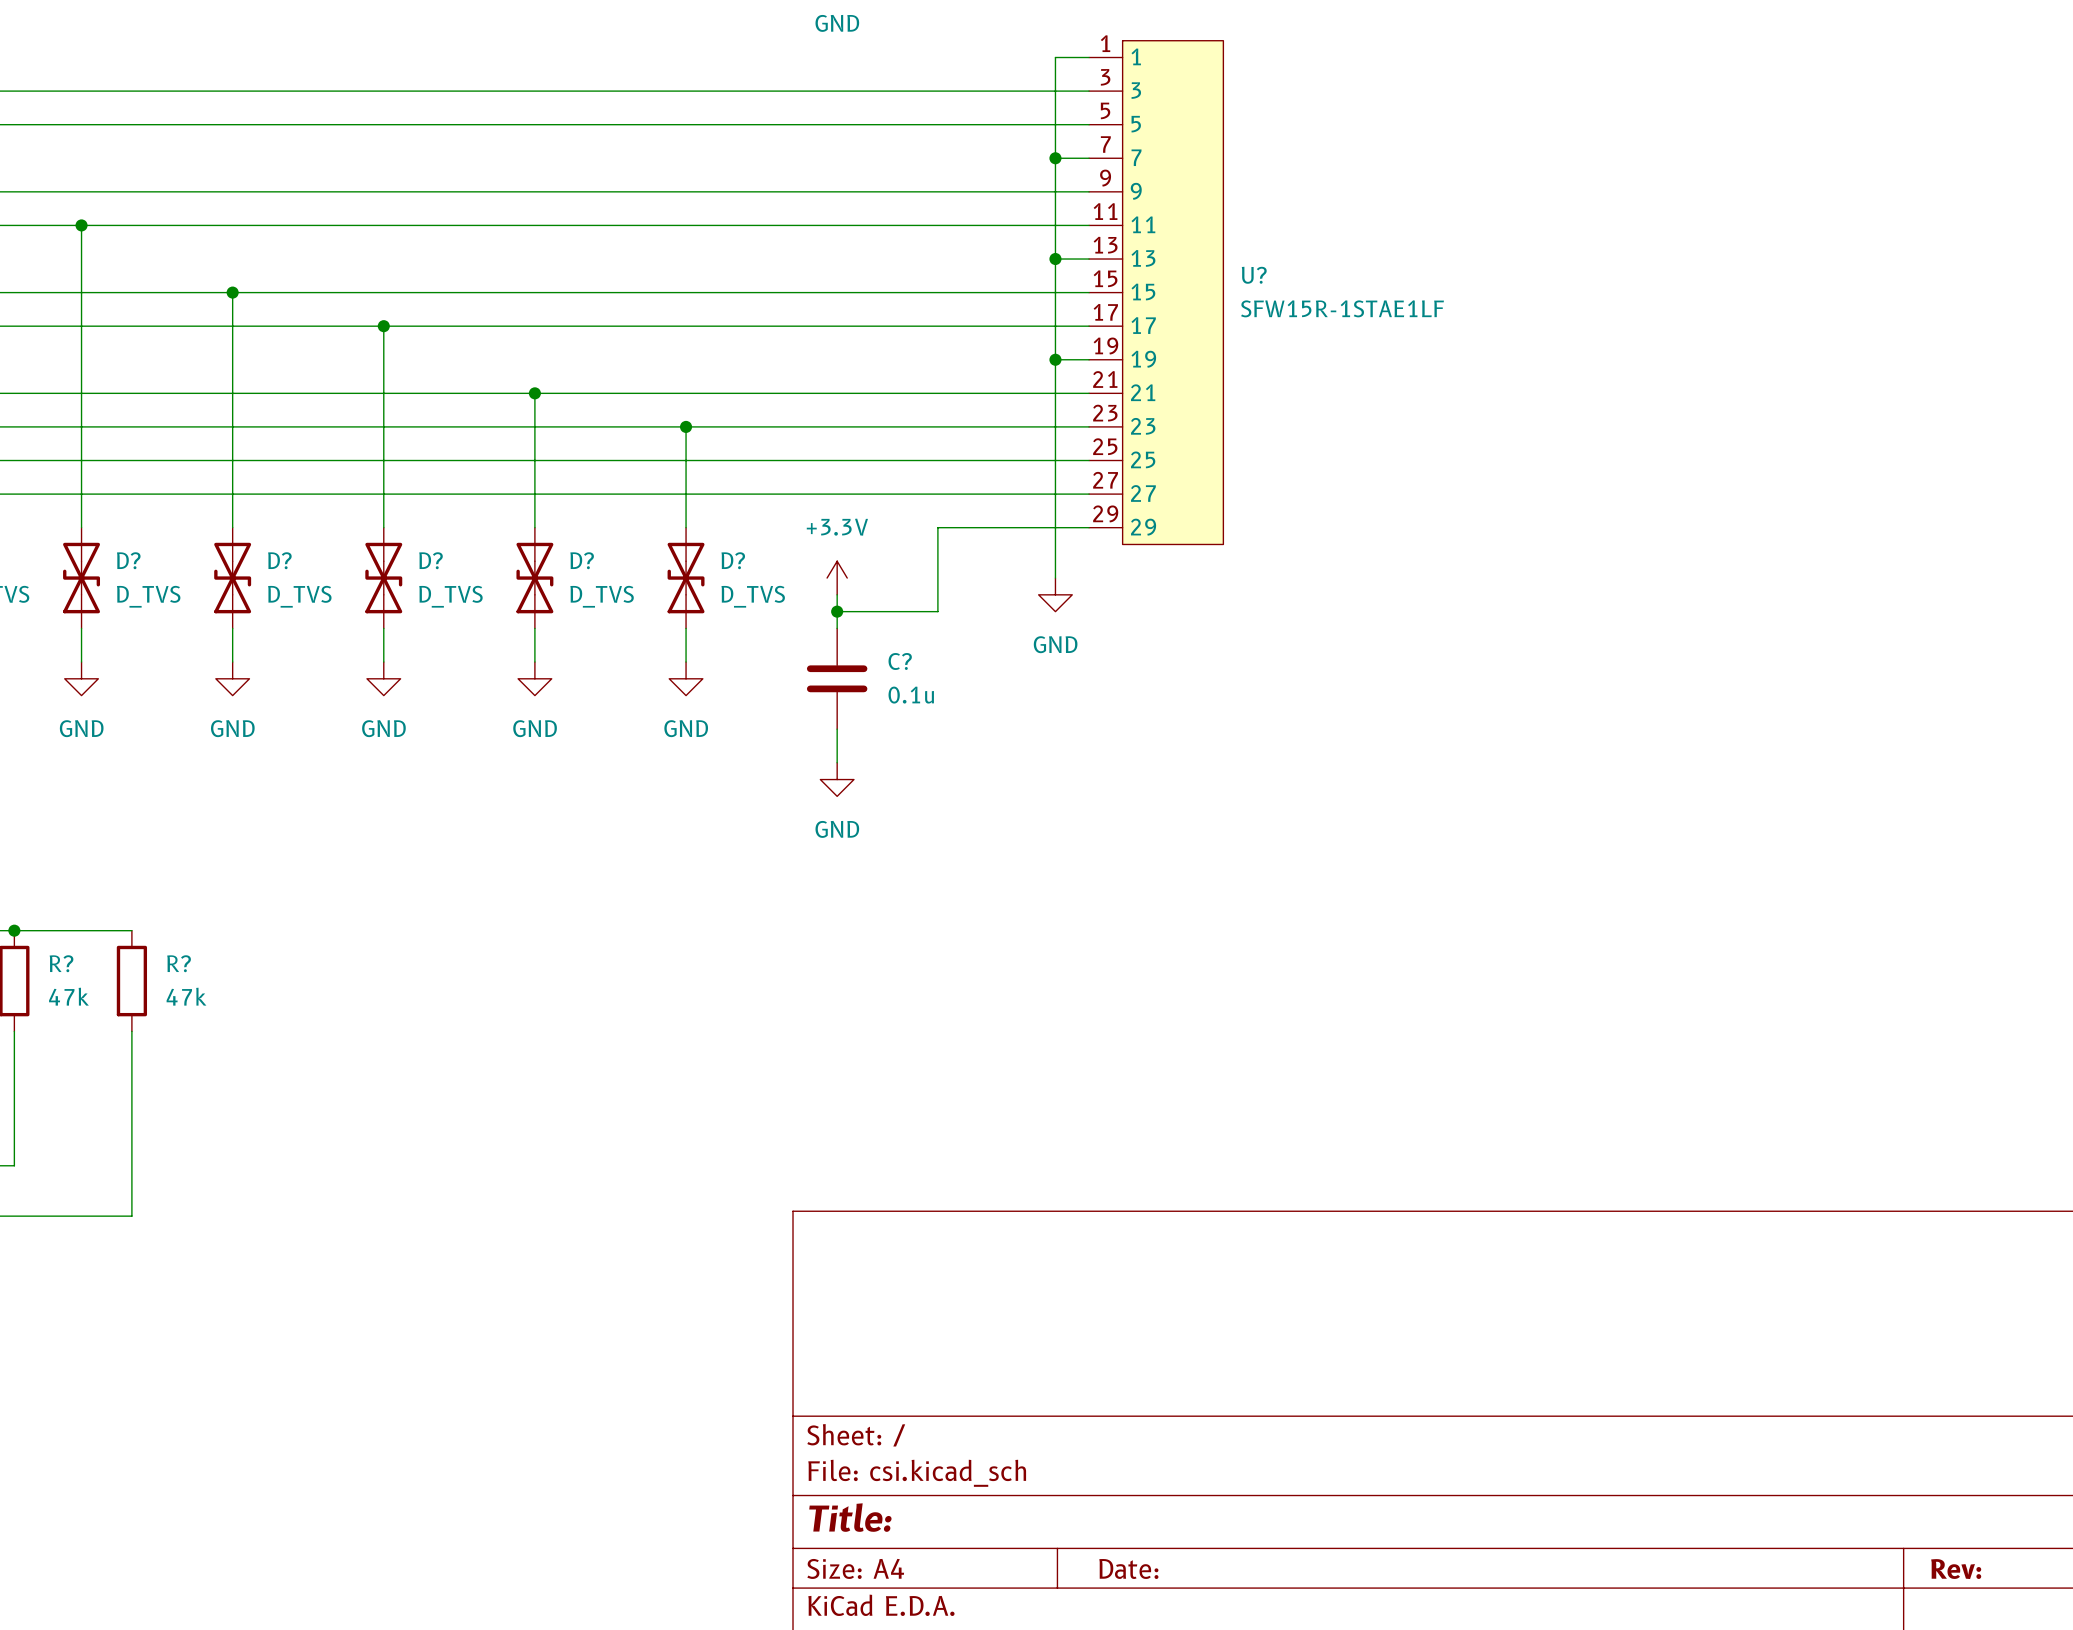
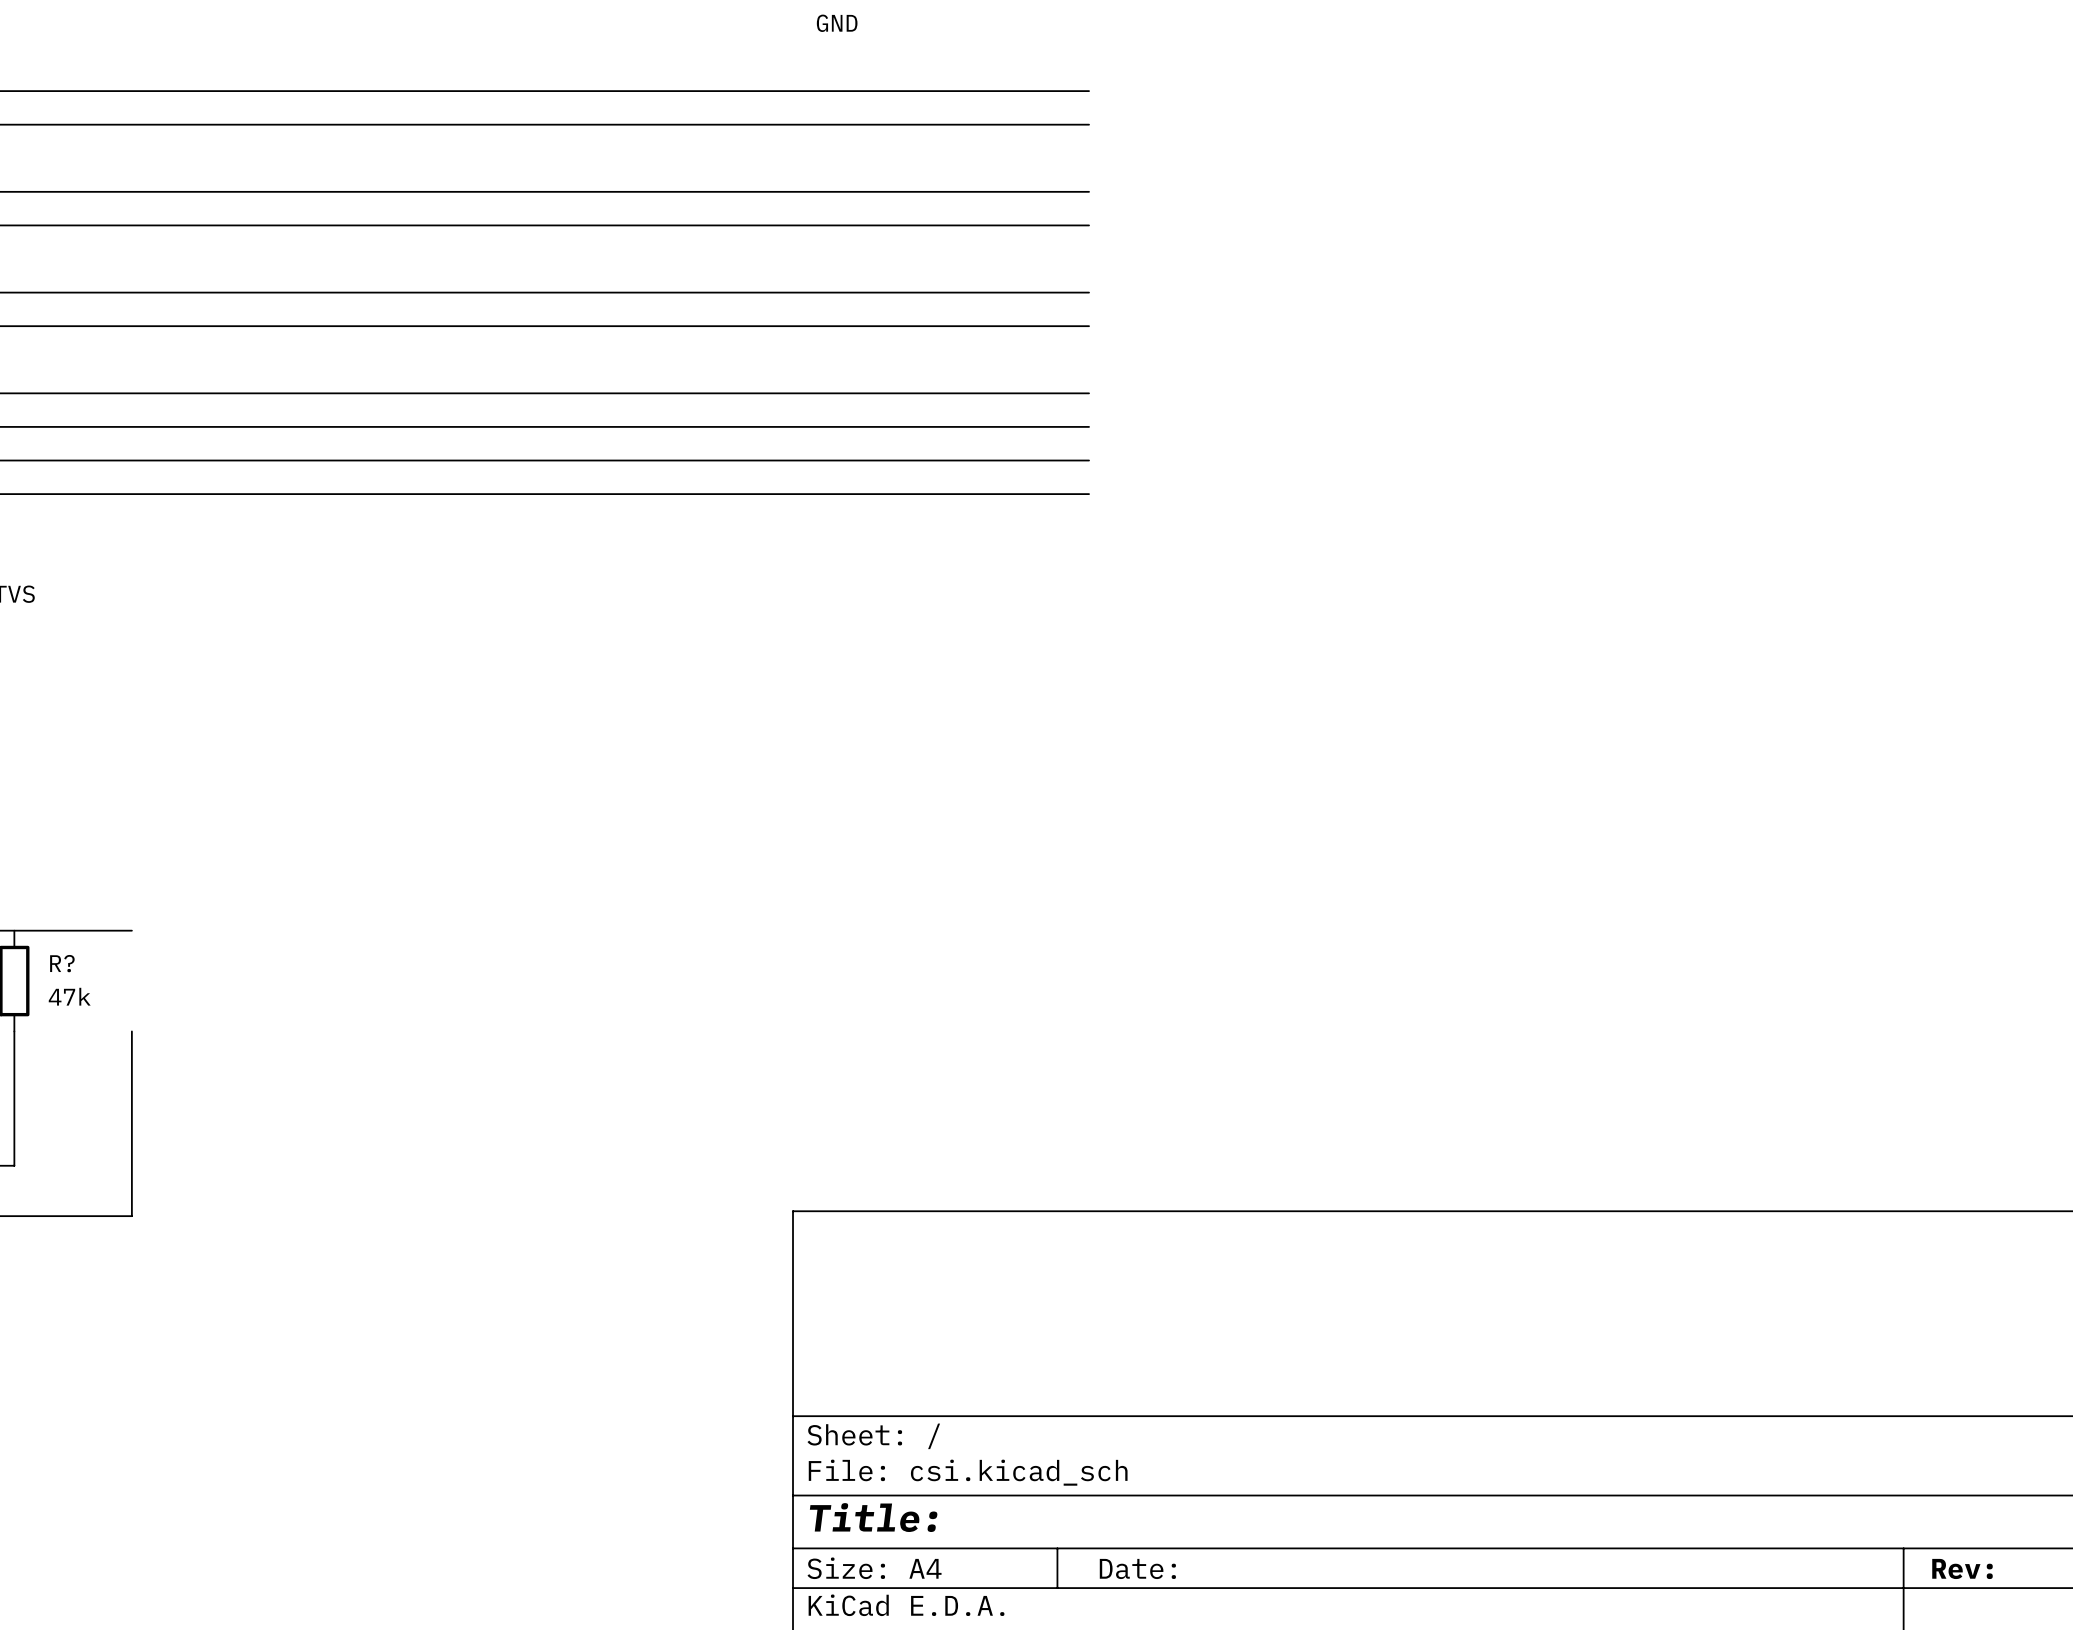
wire: (1089, 57) (1055, 57) (1055, 578) -> none
wire: (1055, 158) (1089, 158) -> none
junction: (1055, 158) -> none
wire: (81, 225) (81, 527) -> none
junction: (81, 225) -> none
wire: (1055, 259) (1089, 259) -> none
junction: (1055, 259) -> none
wire: (232, 292) (232, 527) -> none
junction: (232, 292) -> none
U?: SFW15R-1STAE1LF (1156, 292) -> none
wire: (383, 326) (383, 527) -> none
junction: (383, 326) -> none
wire: (1055, 359) (1089, 359) -> none
junction: (1055, 359) -> none
wire: (534, 393) (534, 527) -> none
junction: (534, 393) -> none
wire: (686, 426) (686, 527) -> none
junction: (686, 426) -> none
wire: (1089, 527) (937, 527) (937, 611) (837, 611) -> none
D?: D_TVS (81, 578) -> none
D?: D_TVS (232, 578) -> none
D?: D_TVS (383, 578) -> none
D?: D_TVS (534, 578) -> none
D?: D_TVS (686, 578) -> none
power symbol: +3.3V (837, 578) -> none
wire: (837, 594) (837, 628) -> none
power symbol: GND (1055, 594) -> none
junction: (837, 611) -> none
wire: (81, 628) (81, 662) -> none
wire: (232, 628) (232, 662) -> none
wire: (383, 628) (383, 662) -> none
wire: (534, 628) (534, 662) -> none
wire: (686, 628) (686, 662) -> none
power symbol: GND (81, 678) -> none
power symbol: GND (232, 678) -> none
power symbol: GND (383, 678) -> none
power symbol: GND (534, 678) -> none
power symbol: GND (686, 678) -> none
C?: 0.1u (837, 678) -> none
wire: (837, 729) (837, 762) -> none
power symbol: GND (837, 779) -> none
junction: (14, 930) -> none
R?: 47k (131, 981) -> none

